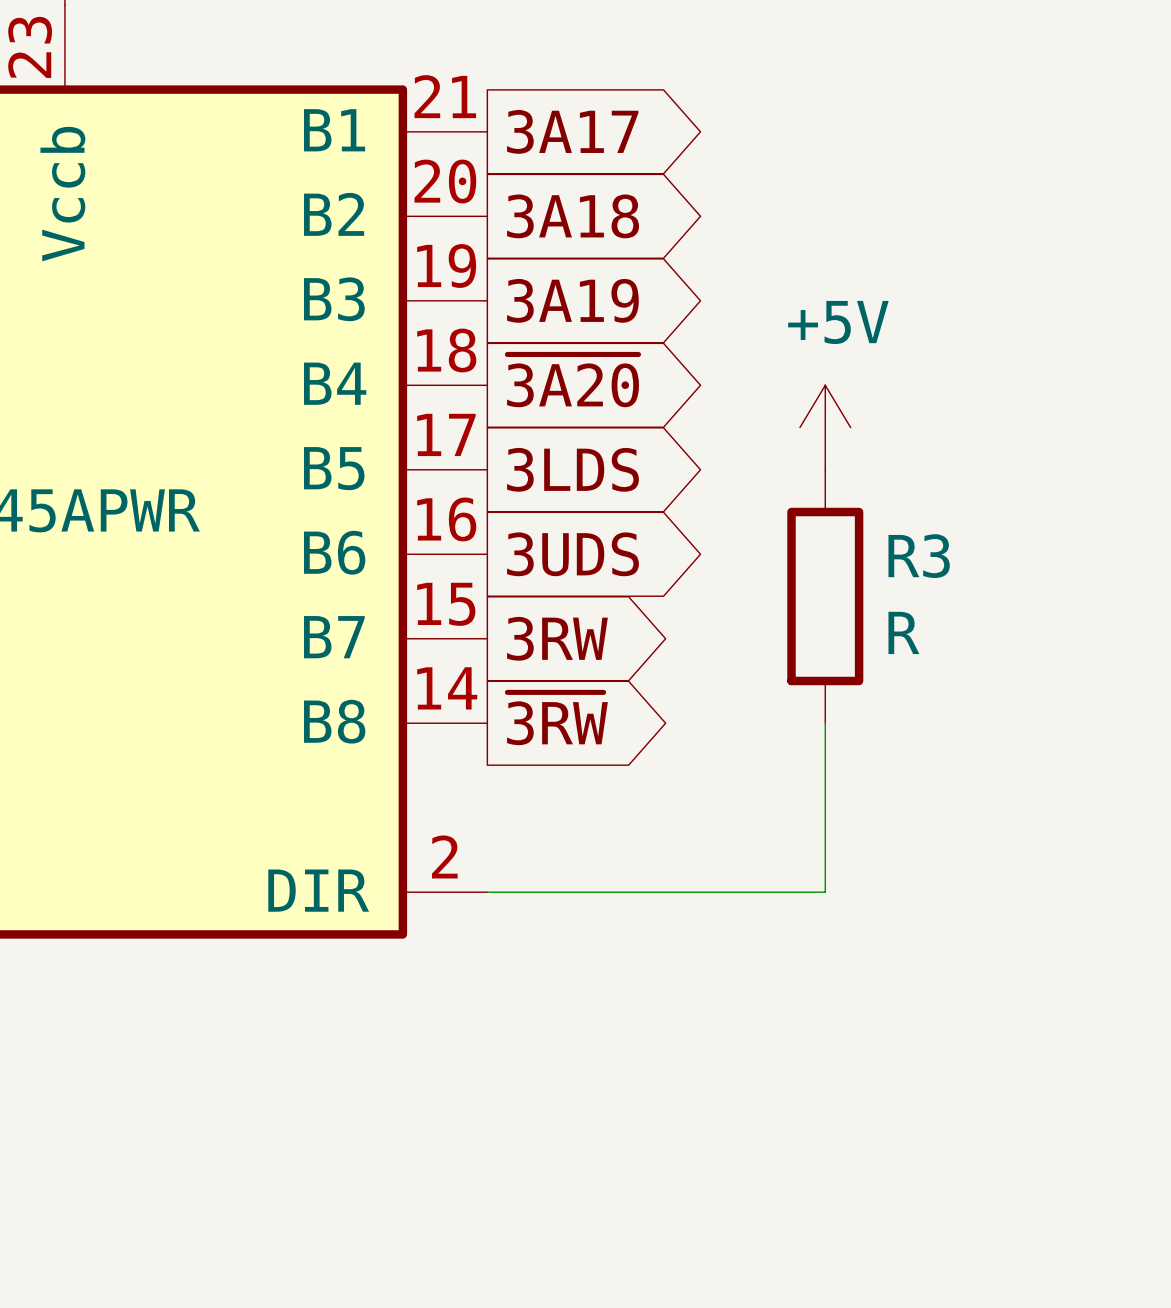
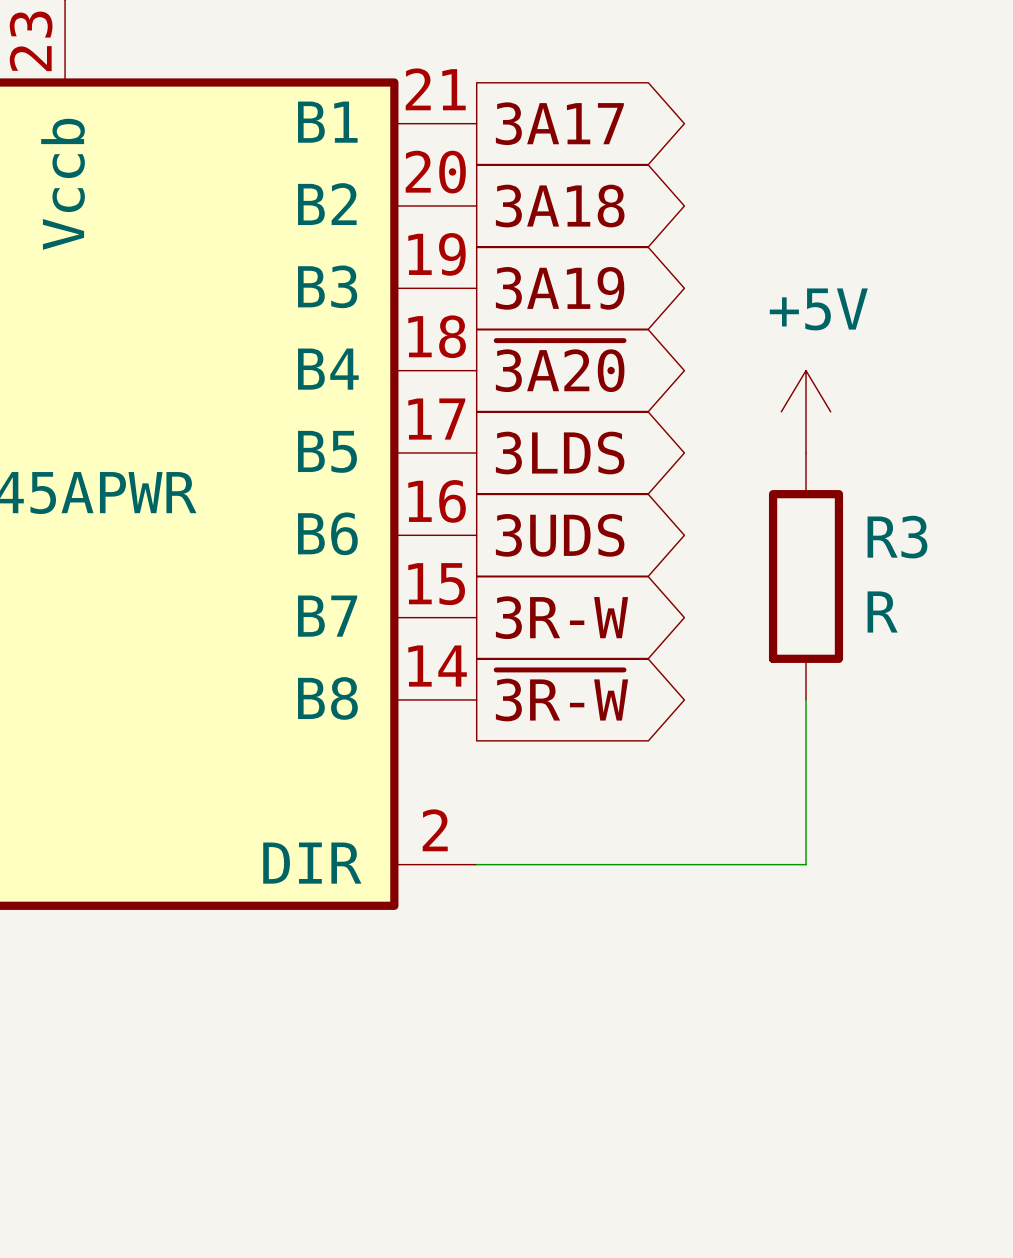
global label: 3RW (557, 638) -> 3R-W (562, 617)
global label: ~{3RW} (557, 718) -> ~{3R-W} (562, 695)

